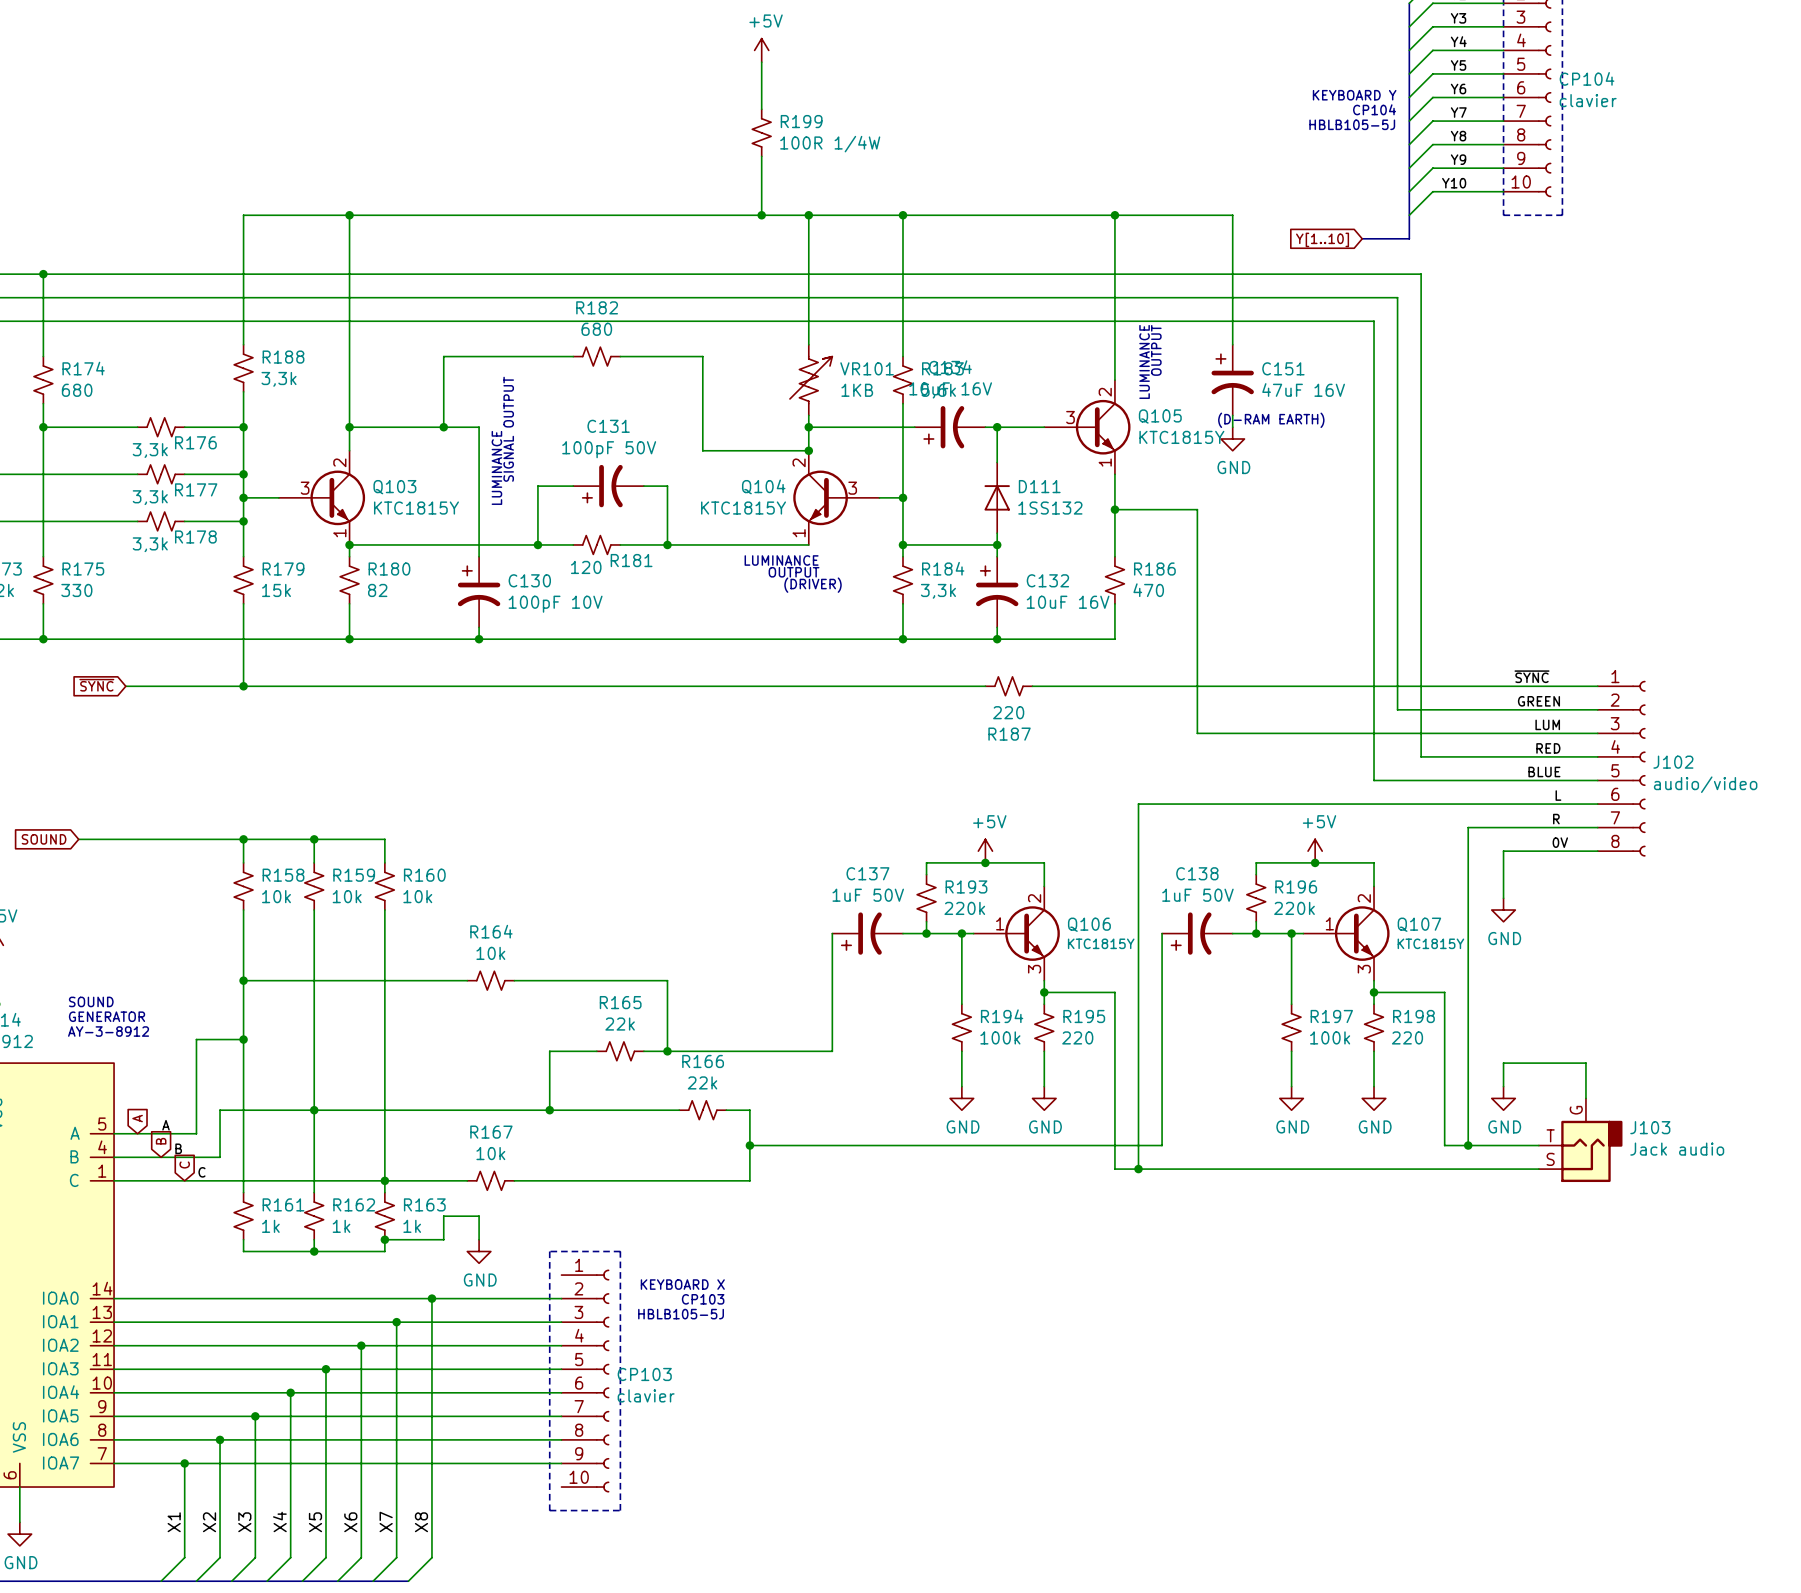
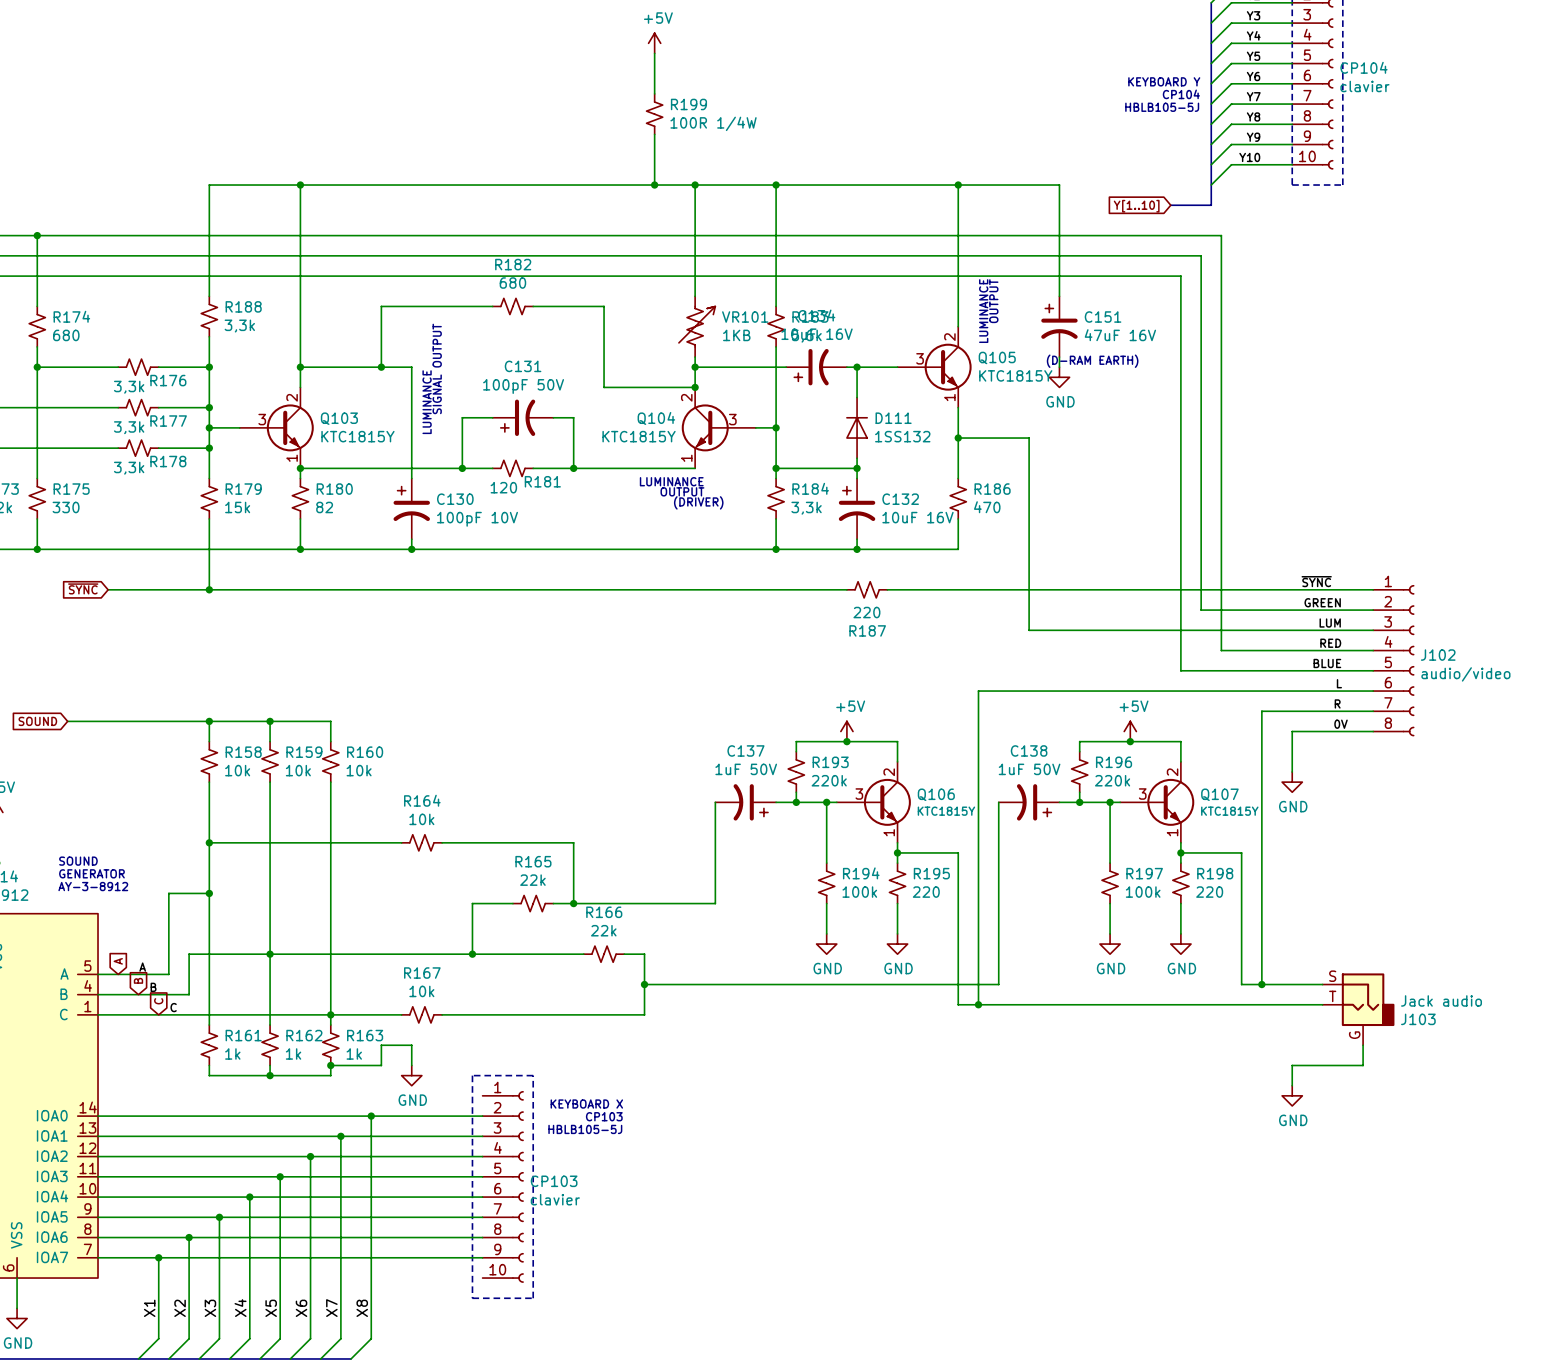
Q106 pin number: 1 (1000, 923) -> 3 (859, 794)
Q107 pin number: 1 (1329, 923) -> 3 (1142, 794)
C137 flip: as is (861, 933) -> left-right (750, 802)
C138 flip: as is (1191, 933) -> left-right (1034, 802)
Q106 pin number: 3 (1034, 969) -> 1 (889, 832)
Q107 pin number: 3 (1364, 969) -> 1 (1172, 832)
wire: (1503, 1086) (1503, 1063) (1585, 1063) (1585, 1098) -> none
power symbol position: GND (1503, 1098) -> GND (1292, 1095)
J103 flip: as is (1591, 1151) -> up-down (1368, 999)
wire: none -> (1363, 1045) (1363, 1065) (1292, 1065) (1292, 1085)

